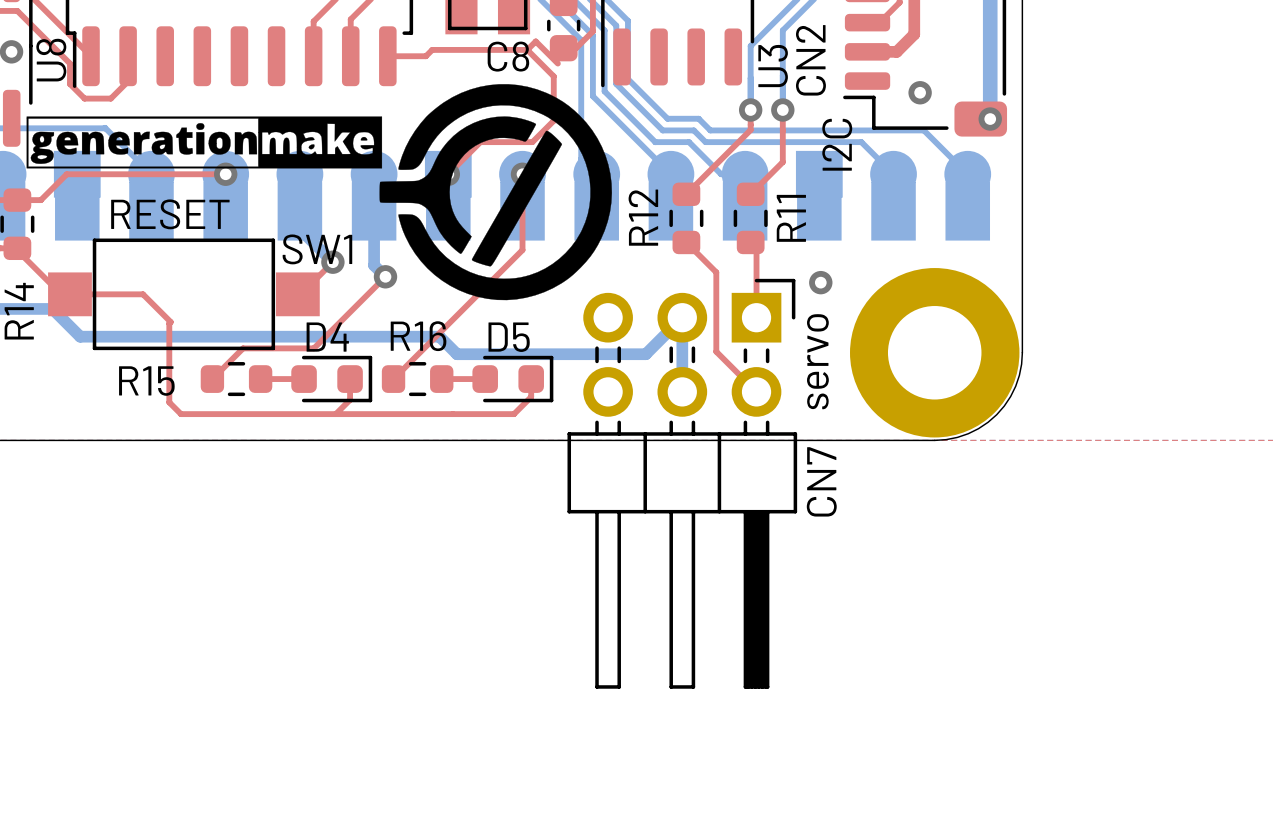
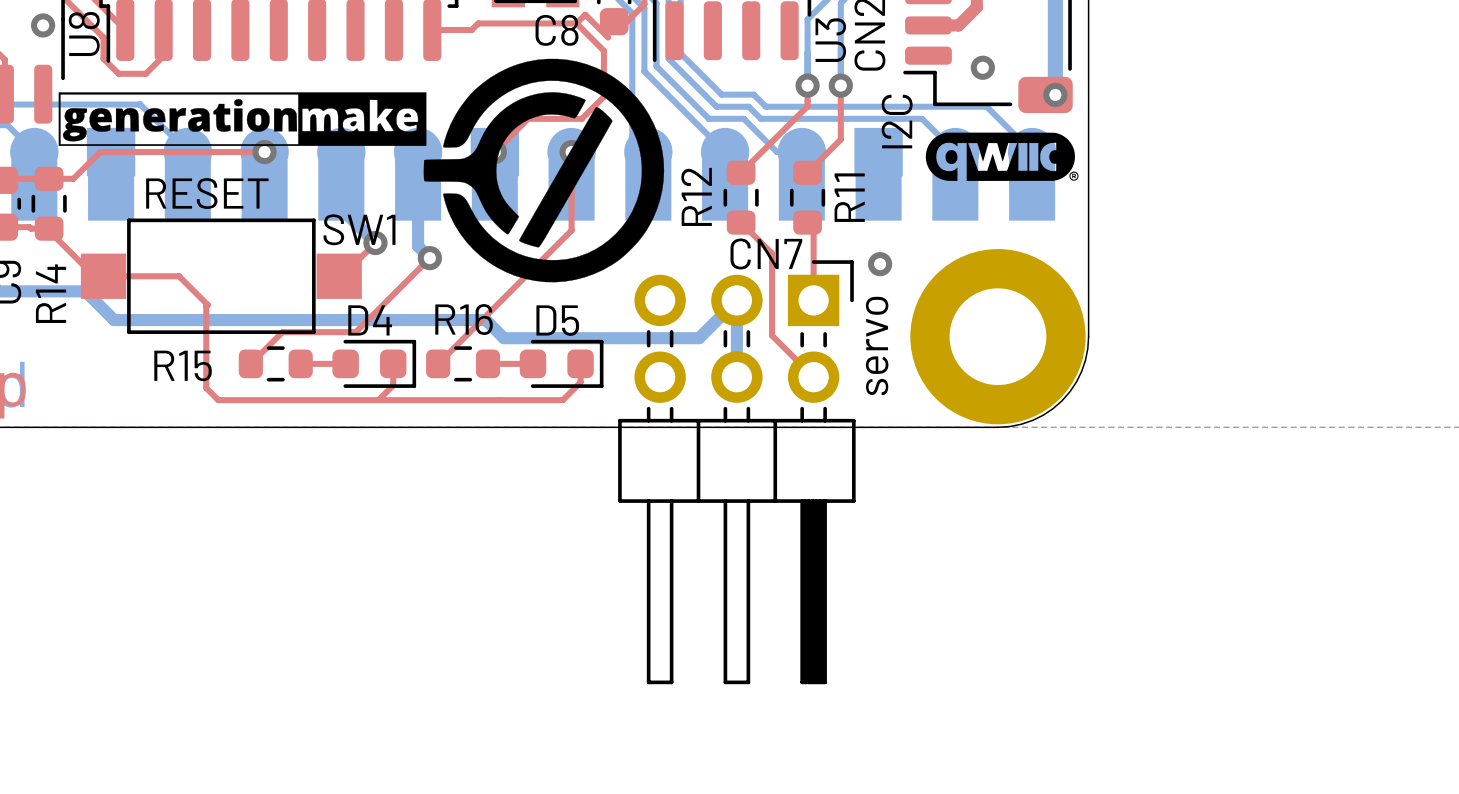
drawing: none -> [925, 132, 1079, 181]
CN7 name rotation: 0° (821, 481) -> 90° clockwise (766, 253)
CN7 name position: CN7 (821, 481) -> CN7 (766, 253)

